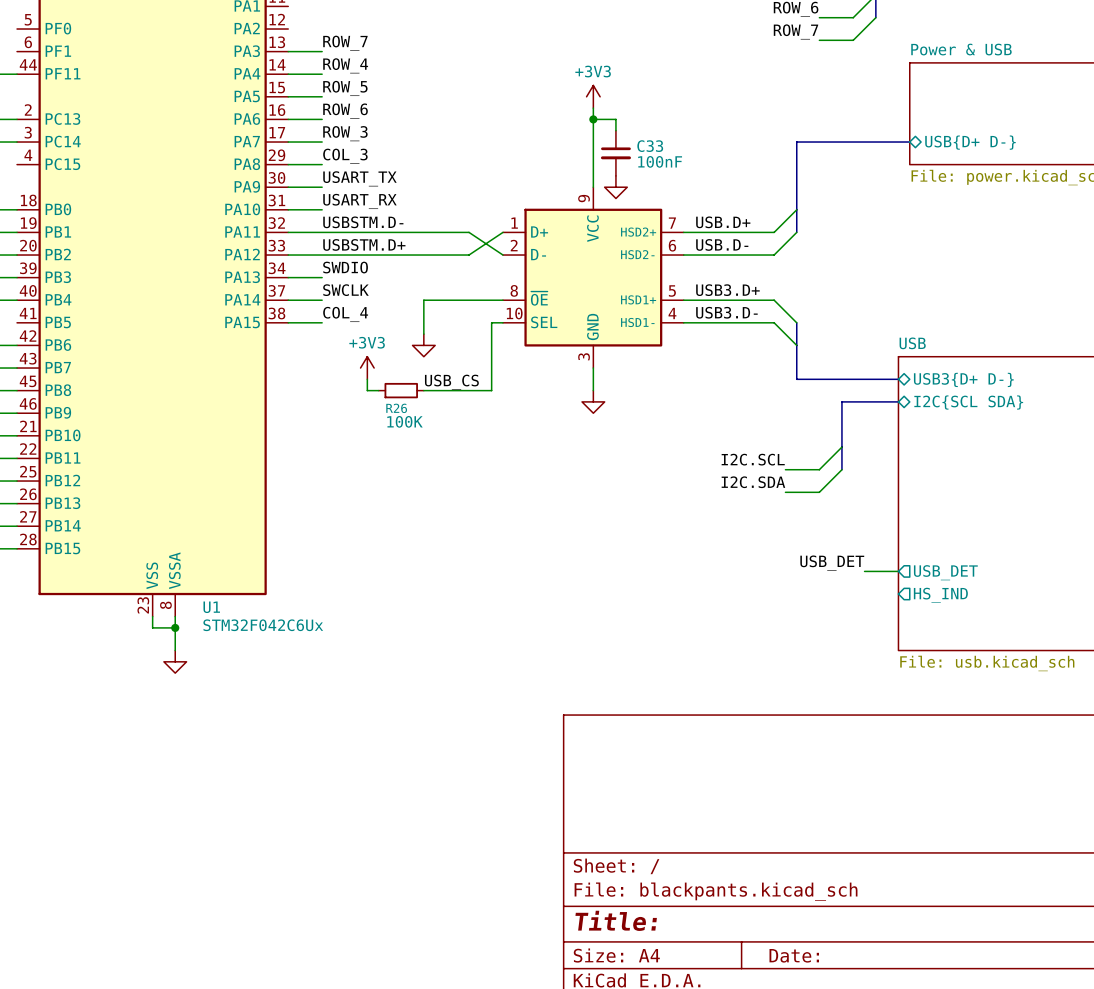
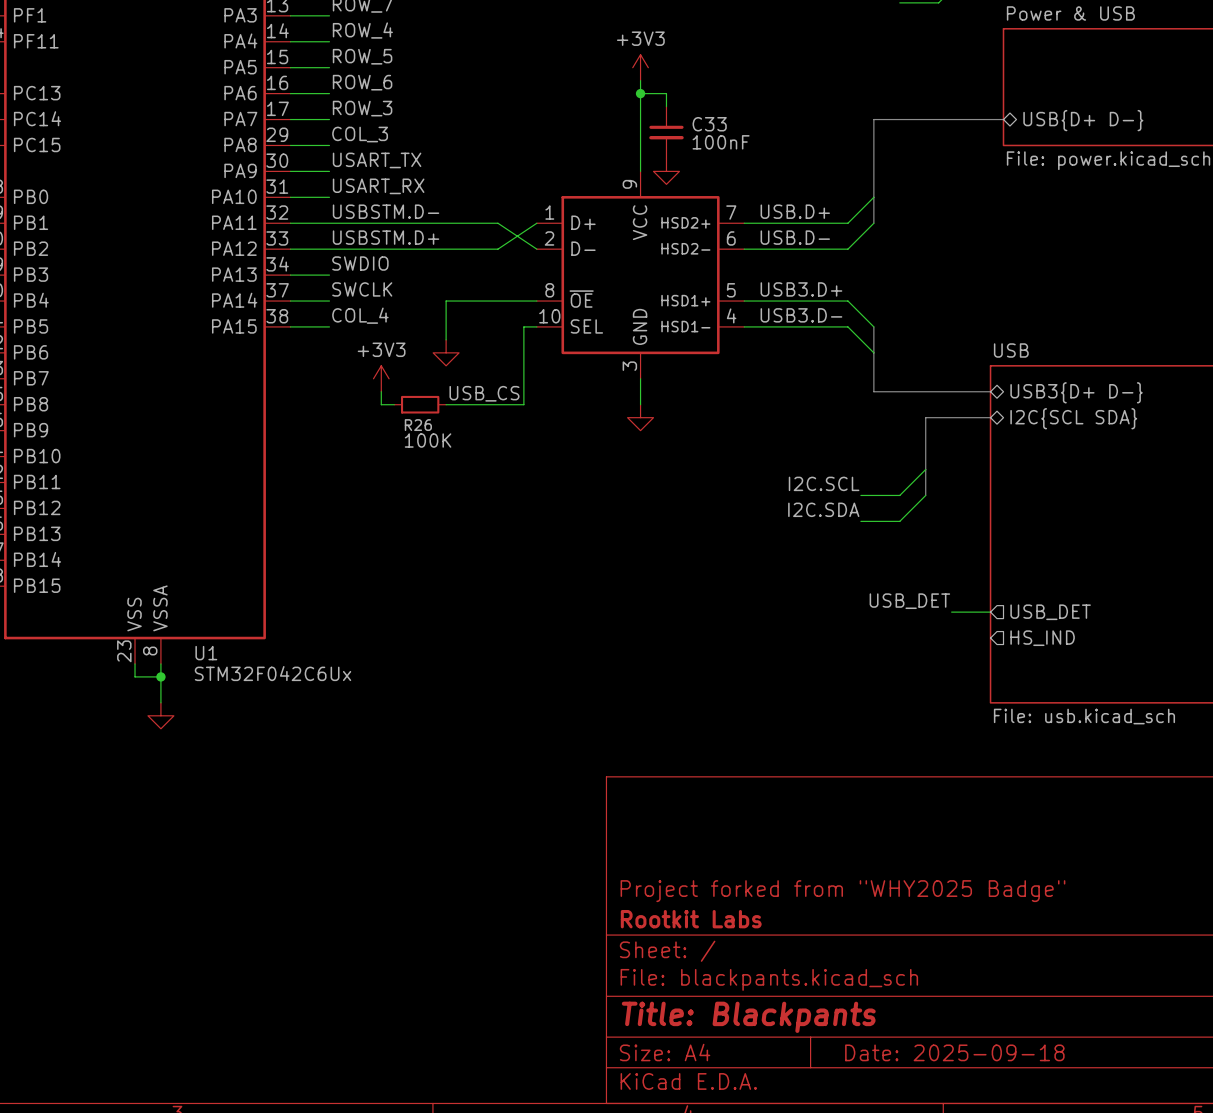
title block: none -> Project forked from "WHY2025 Badge" (842, 891)
title block: none -> Rootkit Labs (691, 919)
title block: Title: (616, 920) -> Title: Blackpants (748, 1017)
title block: Date: (794, 955) -> Date: 2025-09-18 (954, 1052)

